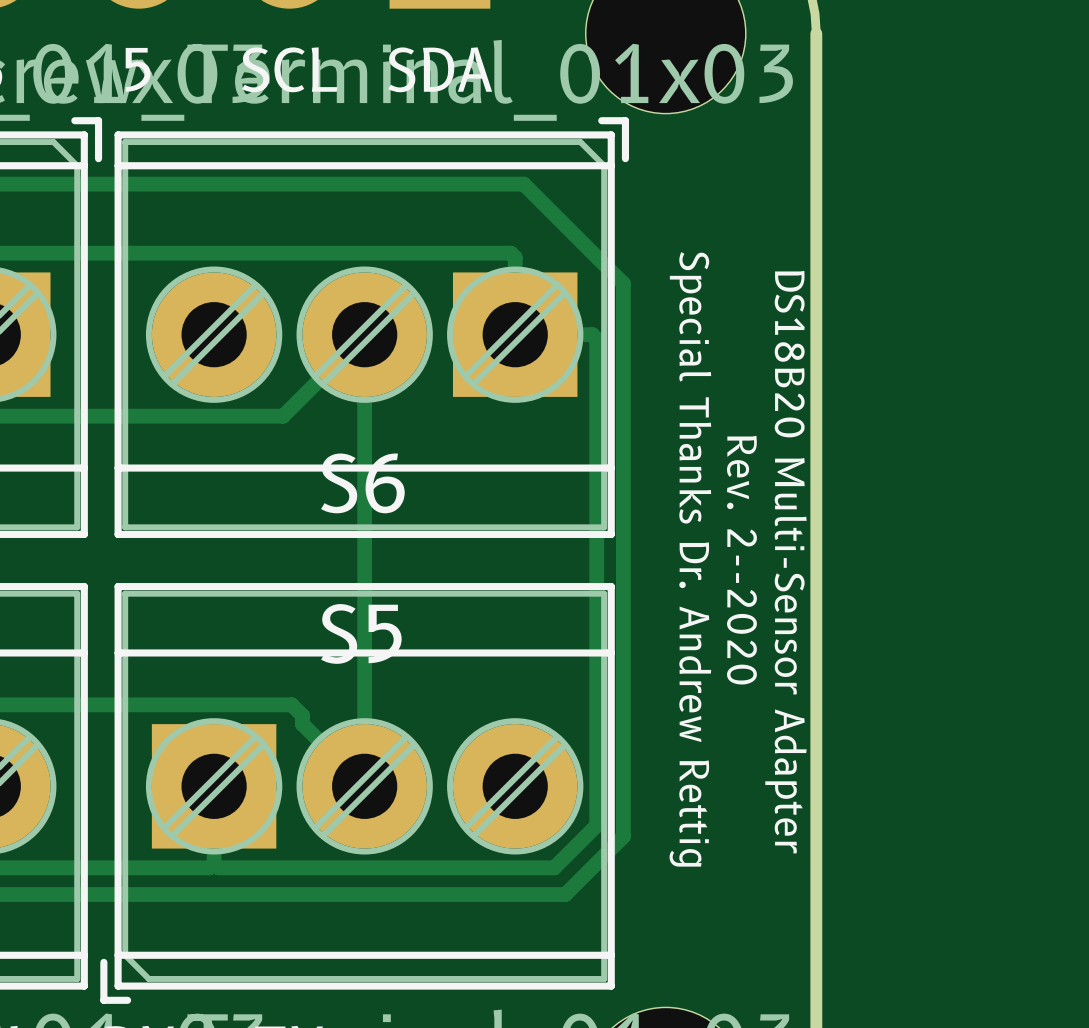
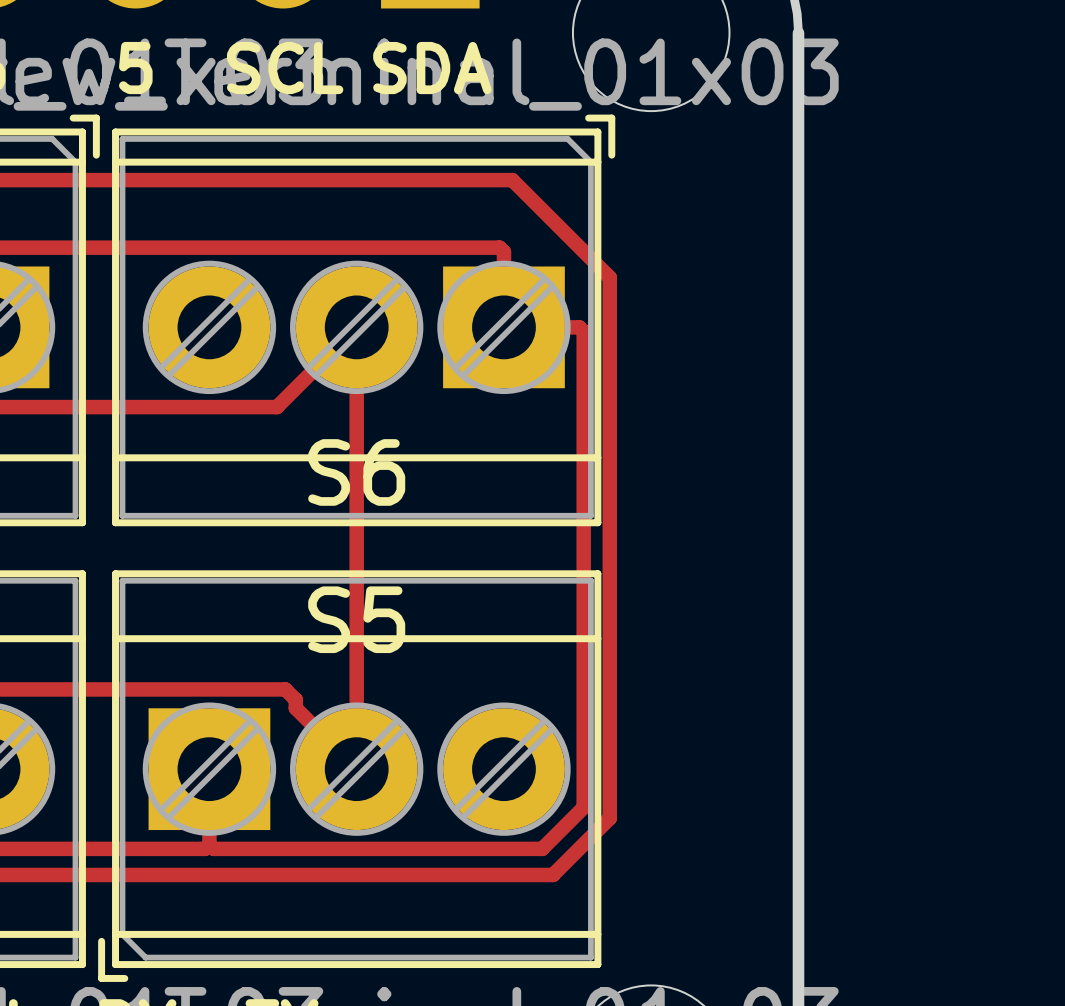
text: Special Thanks Dr. Andrew Rettig (690, 559) -> none
text: Rev. 2--2020 (741, 560) -> none
text: DS18B20 Multi-Sensor Adapter (785, 562) -> none

